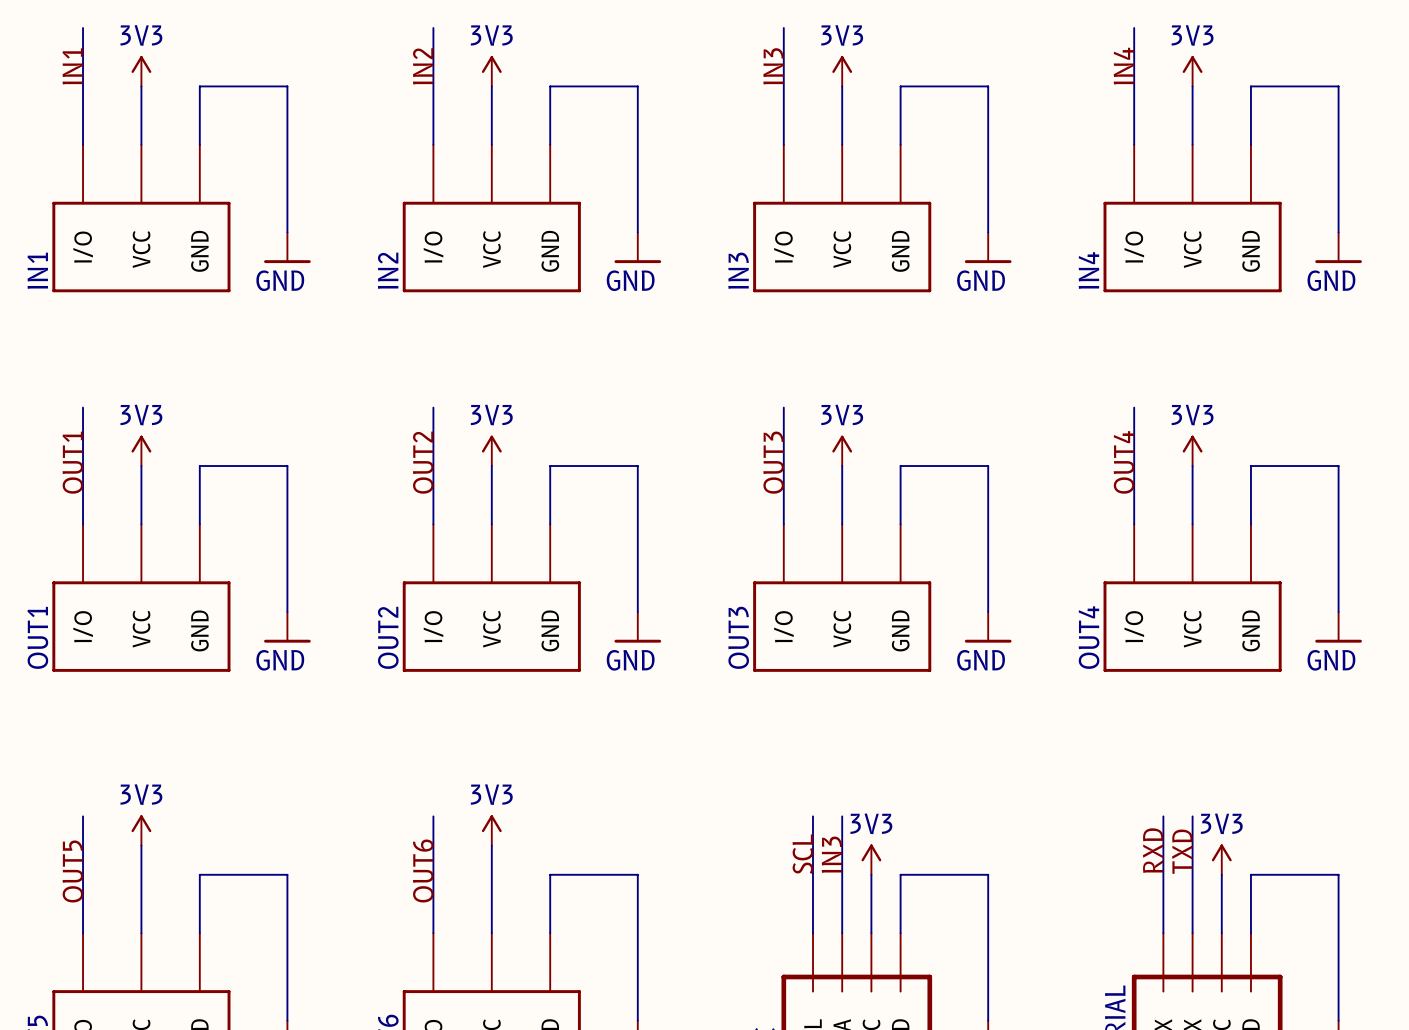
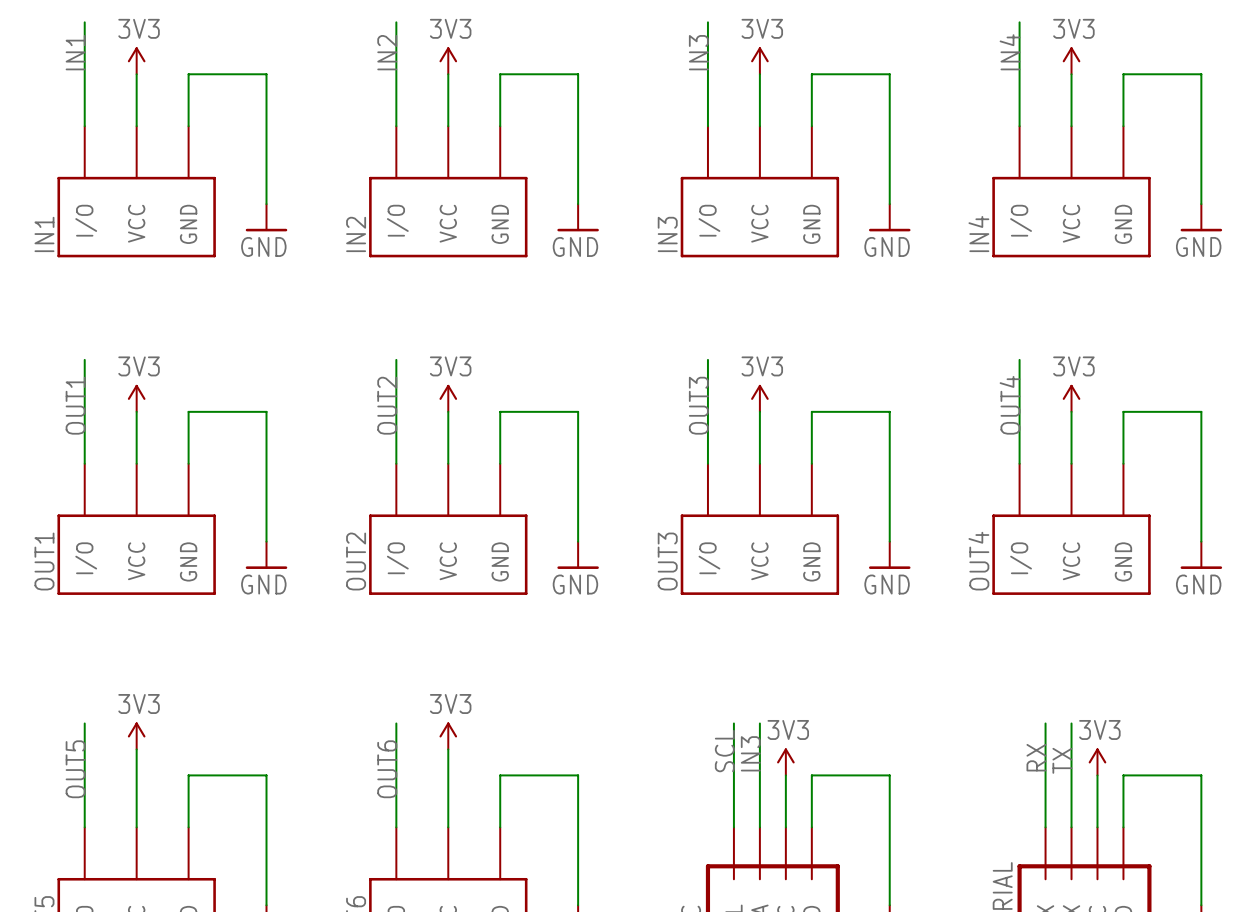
label: RXD (1153, 850) -> RX (1036, 757)
label: TXD (1182, 851) -> TX (1062, 760)

